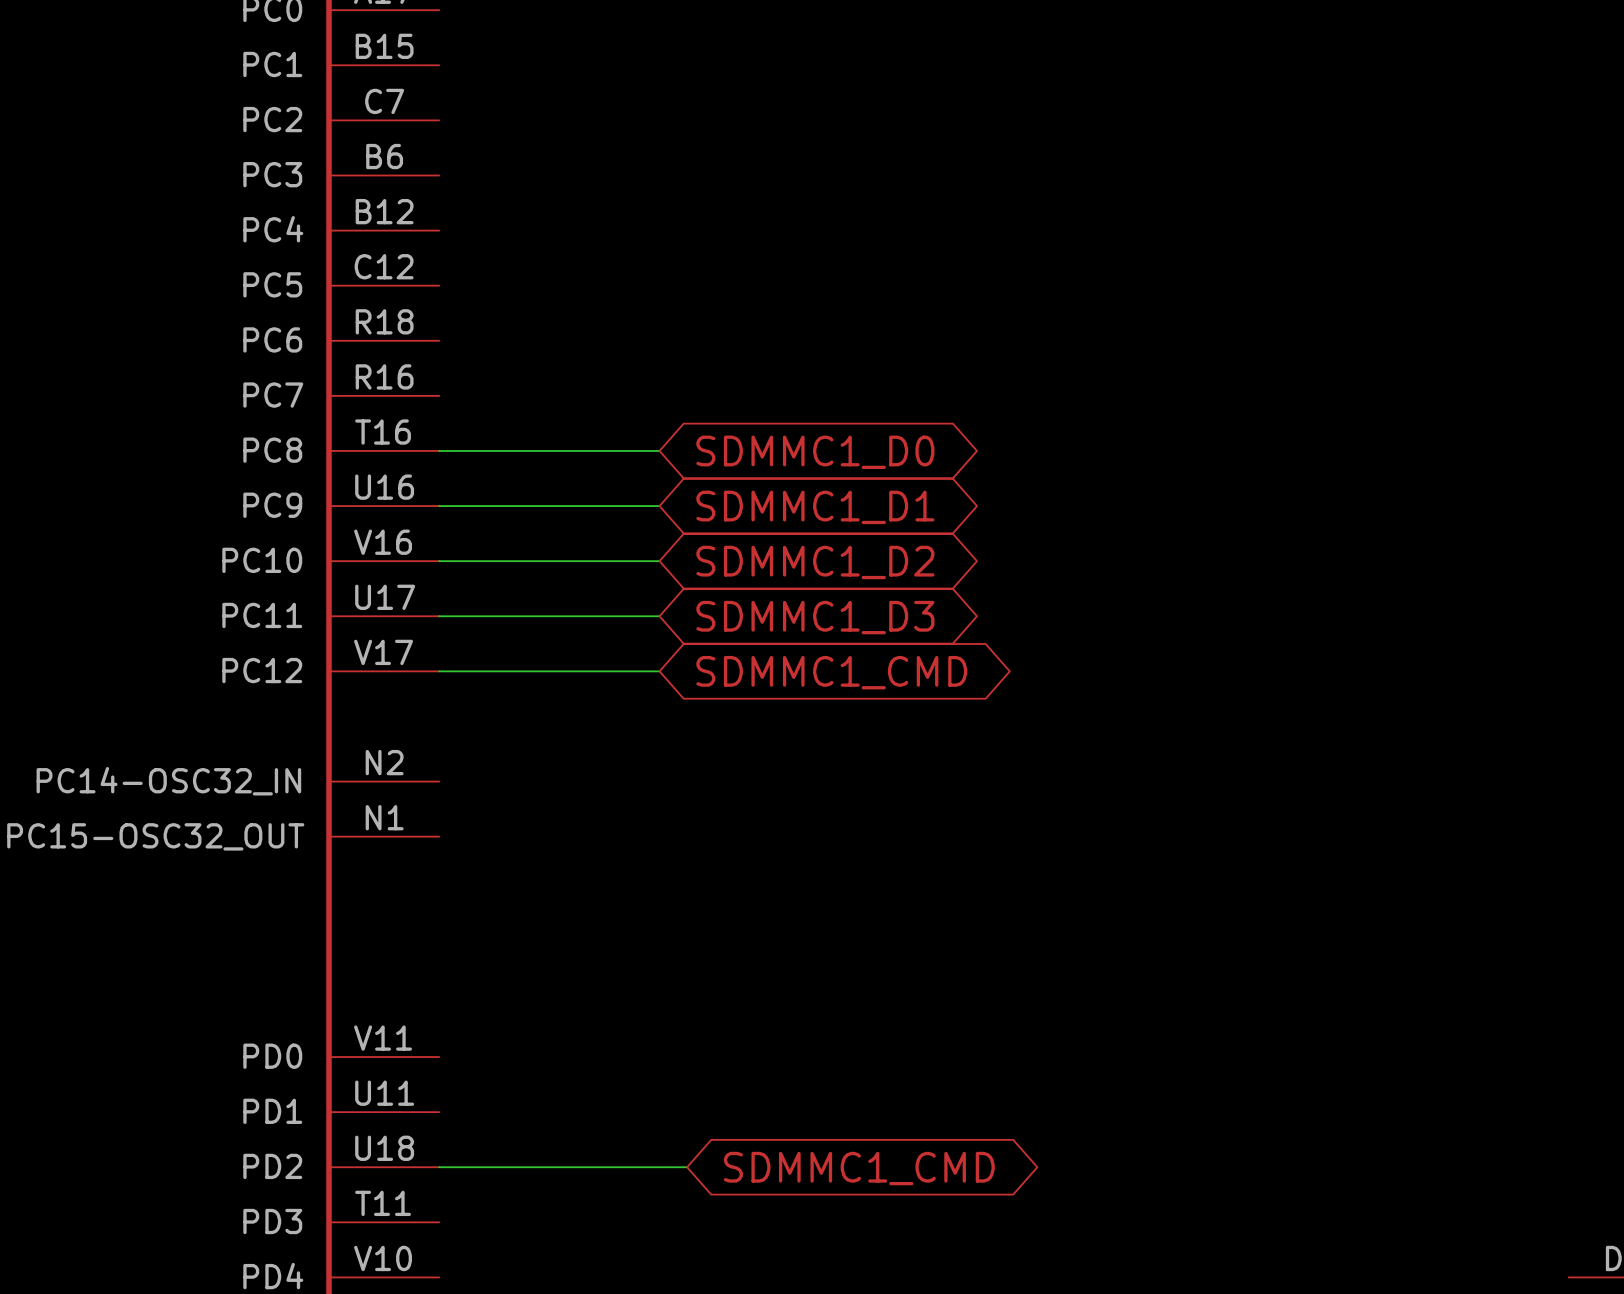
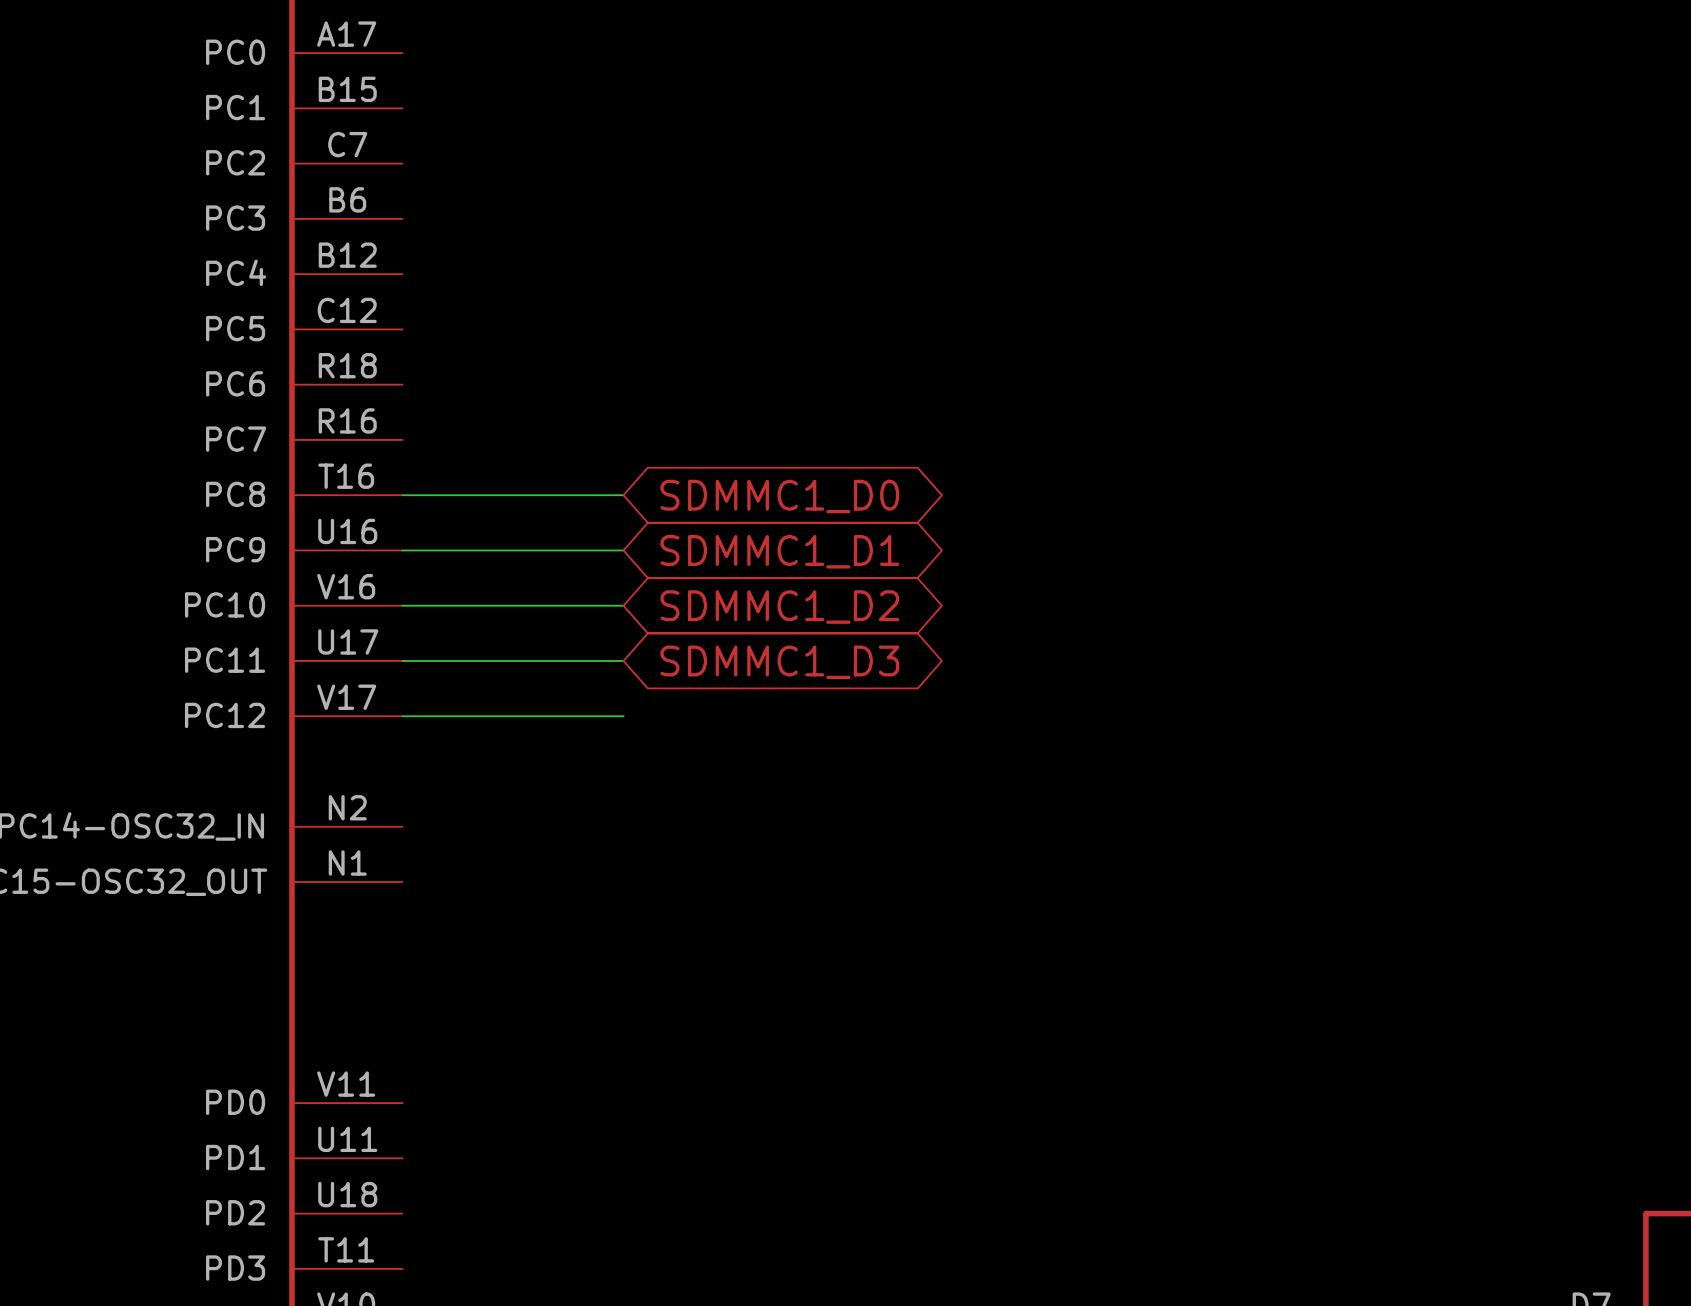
global label: SDMMC1_CMD (831, 672) -> none
wire: (439, 1167) (687, 1167) -> none
global label: SDMMC1_CMD (859, 1168) -> none

